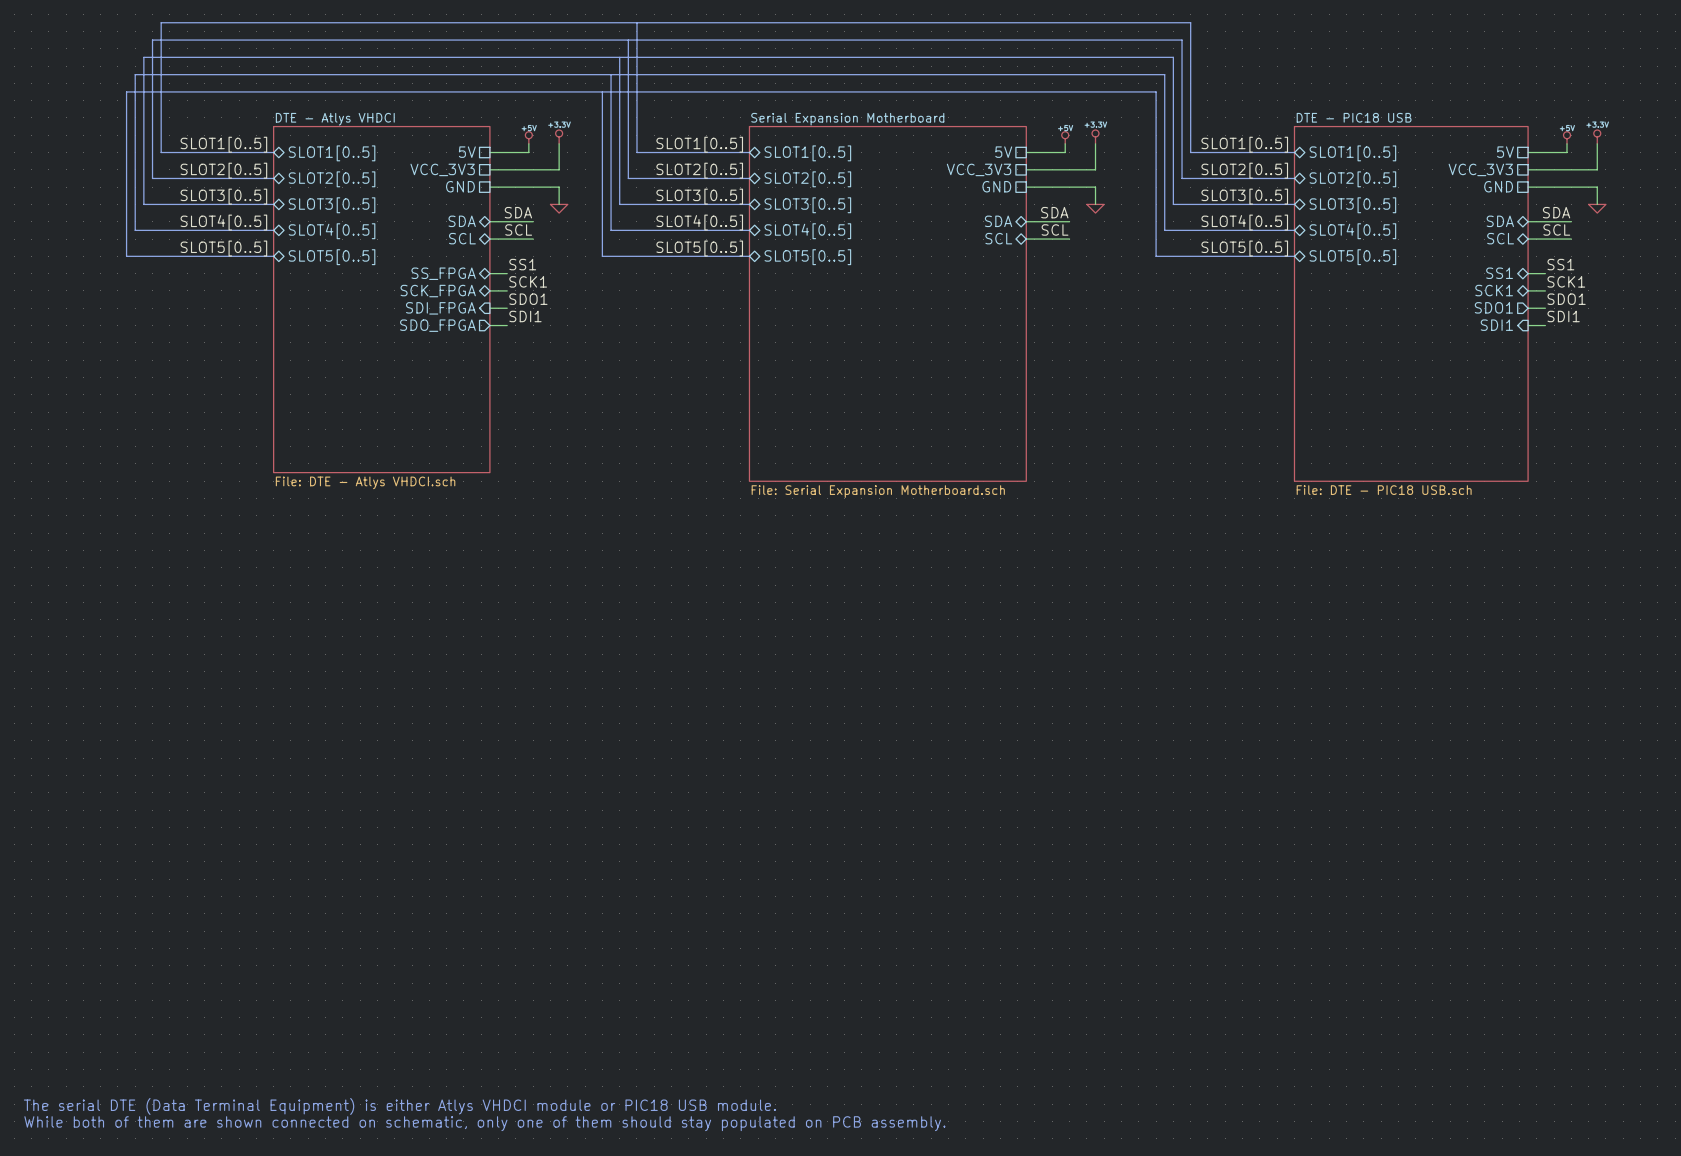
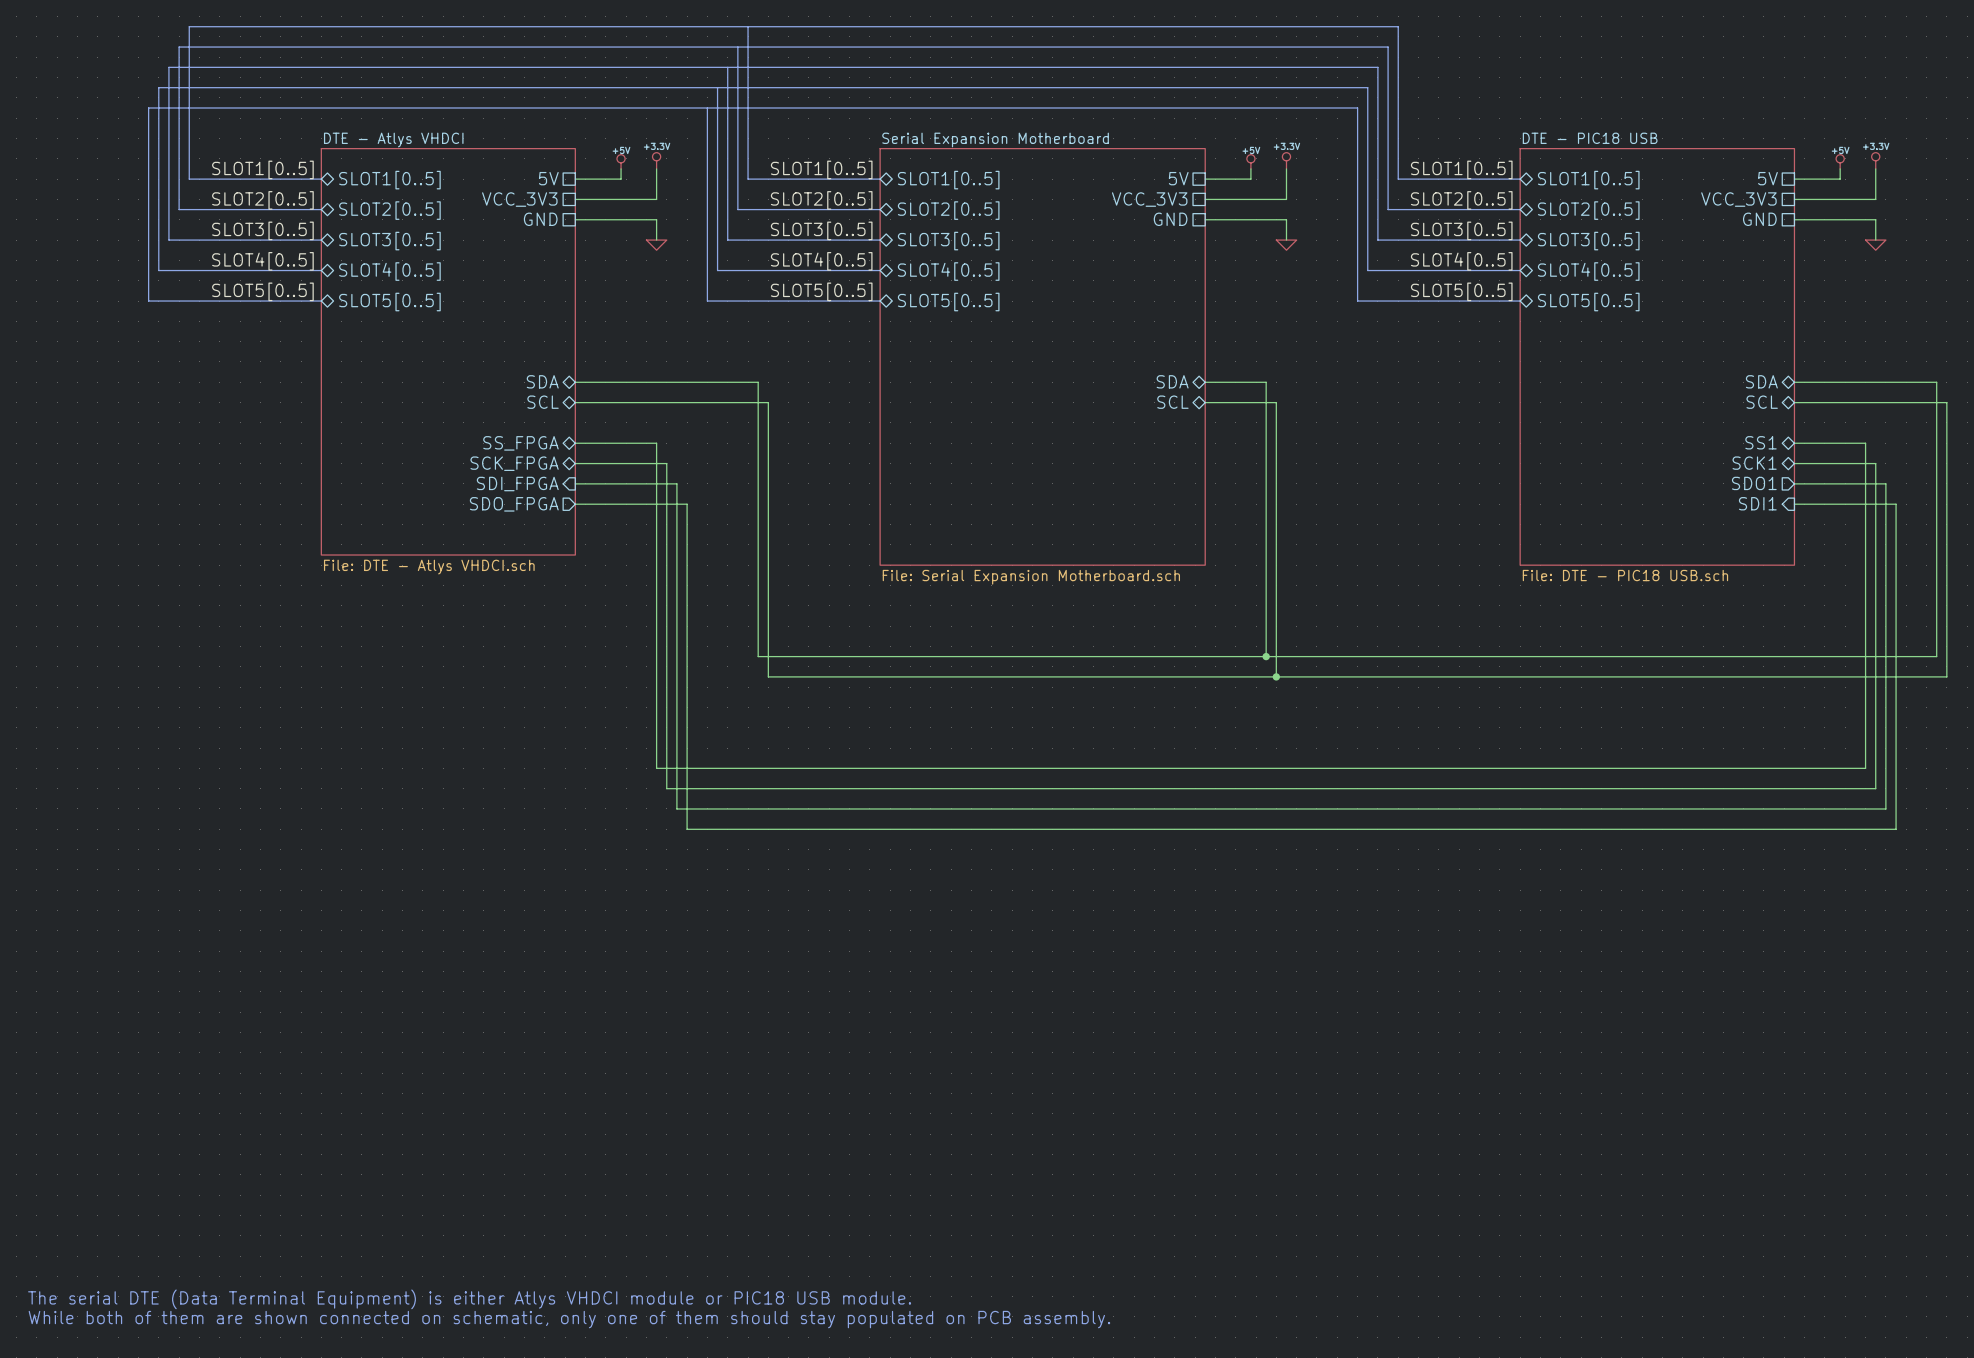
label: SDA (518, 212) -> none
label: SDA (1054, 212) -> none
label: SDA (1556, 212) -> none
sheet pin: SDA (462, 221) -> none
wire: (489, 221) (533, 221) -> none
sheet pin position: SDA (998, 221) -> SDA (1172, 381)
wire: (1026, 221) (1069, 221) -> none
sheet pin: SDA (1500, 221) -> none
wire: (1528, 221) (1571, 221) -> none
label: SCL (518, 229) -> none
label: SCL (1055, 229) -> none
label: SCL (1556, 229) -> none
sheet pin position: SCL (462, 238) -> SCL (543, 402)
sheet pin position: SCL (998, 238) -> SCL (1172, 402)
sheet pin position: SCL (1500, 238) -> SCL (1762, 402)
wire: (489, 239) (533, 239) -> none
wire: (1026, 239) (1069, 239) -> none
wire: (1528, 239) (1571, 239) -> none
label: SS1 (522, 264) -> none
label: SS1 (1560, 264) -> none
sheet pin position: SS_FPGA (443, 273) -> SS_FPGA (520, 443)
wire: (489, 273) (507, 273) -> none
sheet pin position: SS1 (1499, 273) -> SS1 (1760, 442)
wire: (1528, 273) (1545, 273) -> none
label: SCK1 (528, 281) -> none
label: SCK1 (1566, 281) -> none
wire: (489, 290) (507, 290) -> none
sheet pin position: SCK1 (1494, 290) -> SCK1 (1754, 463)
wire: (1528, 290) (1545, 290) -> none
sheet pin position: SCK_FPGA (438, 291) -> SCK_FPGA (514, 463)
label: SDO1 (528, 299) -> none
label: SDO1 (1566, 299) -> none
sheet pin position: SDO1 (1493, 307) -> SDO1 (1754, 483)
sheet pin position: SDI_FPGA (440, 308) -> SDI_FPGA (517, 484)
wire: (489, 308) (507, 308) -> none
wire: (1528, 308) (1545, 308) -> none
label: SDI1 (525, 316) -> none
label: SDI1 (1563, 316) -> none
sheet pin shape: output (437, 325) -> bidirectional (542, 381)
sheet pin: SDO_FPGA (437, 325) -> SDA (542, 381)
wire: none -> (595, 382) (758, 382) (758, 656) (1936, 656) (1936, 382) (1814, 382)
wire: none -> (1205, 382) (1266, 382) (1266, 656)
sheet pin shape: input (1496, 325) -> bidirectional (1761, 381)
sheet pin: SDI1 (1496, 325) -> SDA (1761, 381)
wire: none -> (575, 402) (768, 402) (768, 676) (1946, 676) (1946, 402) (1794, 402)
wire: none -> (1205, 402) (1276, 402) (1276, 676)
wire: none -> (575, 443) (656, 443) (656, 768) (1865, 768) (1865, 443) (1794, 443)
wire: none -> (575, 463) (666, 463) (666, 788) (1875, 788) (1875, 463) (1794, 463)
wire: none -> (575, 483) (676, 483) (676, 808) (1885, 808) (1885, 483) (1794, 483)
sheet pin: none -> SDI1 (1757, 503)
sheet pin: none -> SDO_FPGA (514, 504)
wire: none -> (575, 504) (687, 504) (687, 829) (1896, 829) (1896, 504) (1794, 504)
junction: none -> (1266, 656)
junction: none -> (1276, 676)

